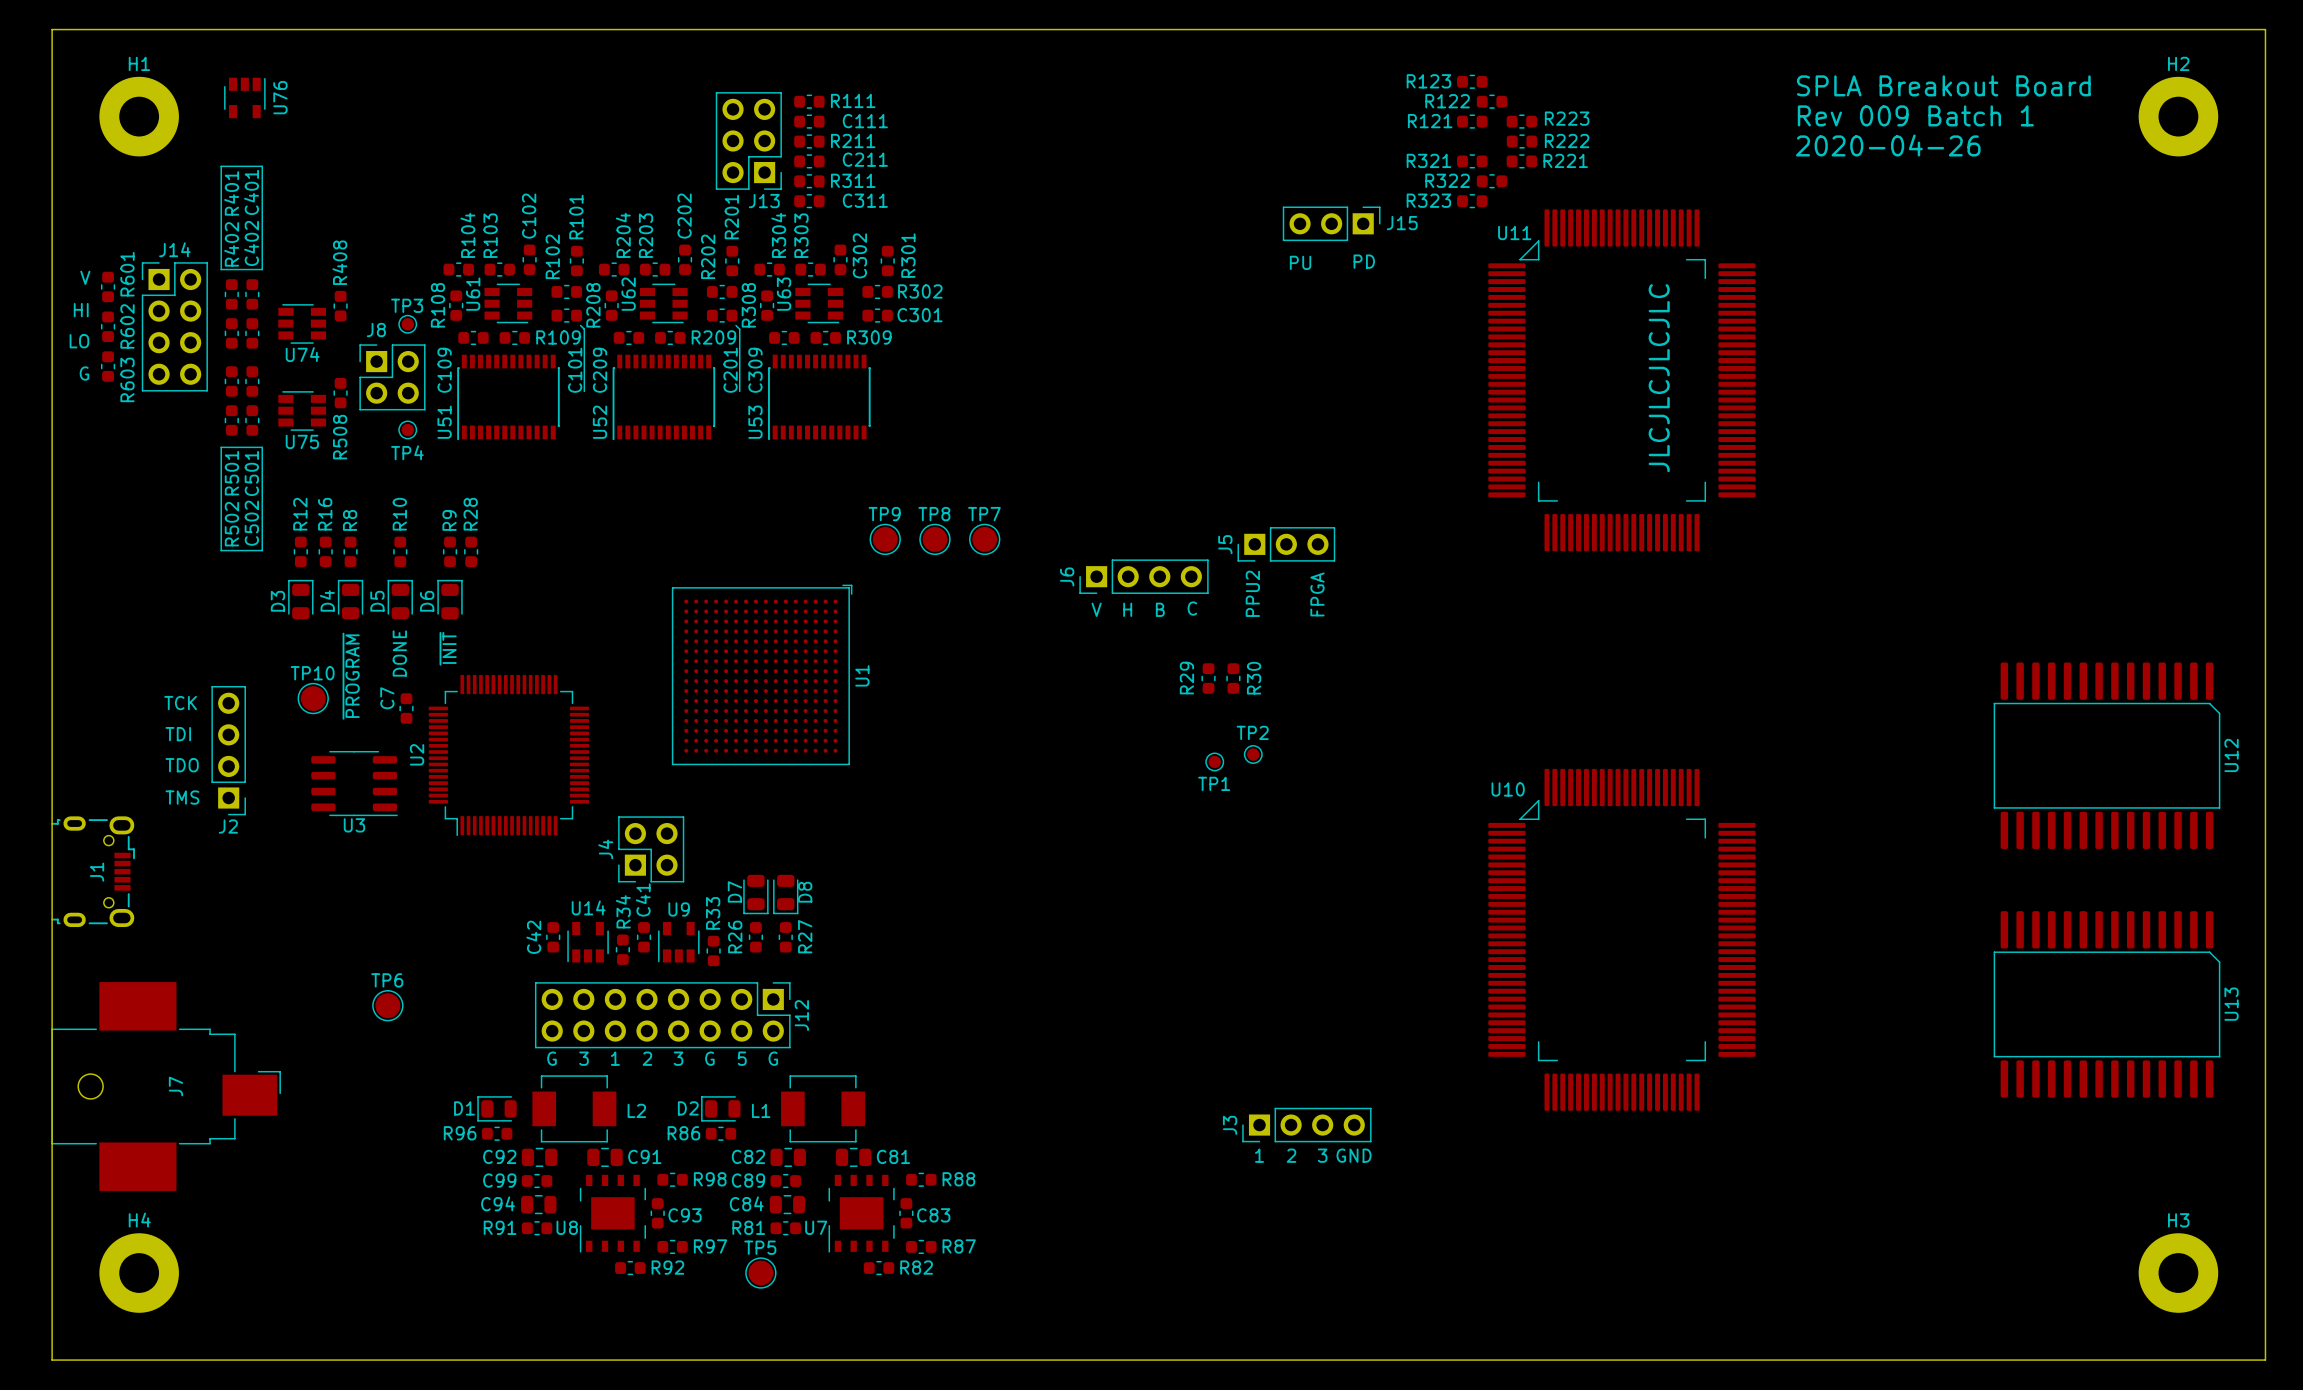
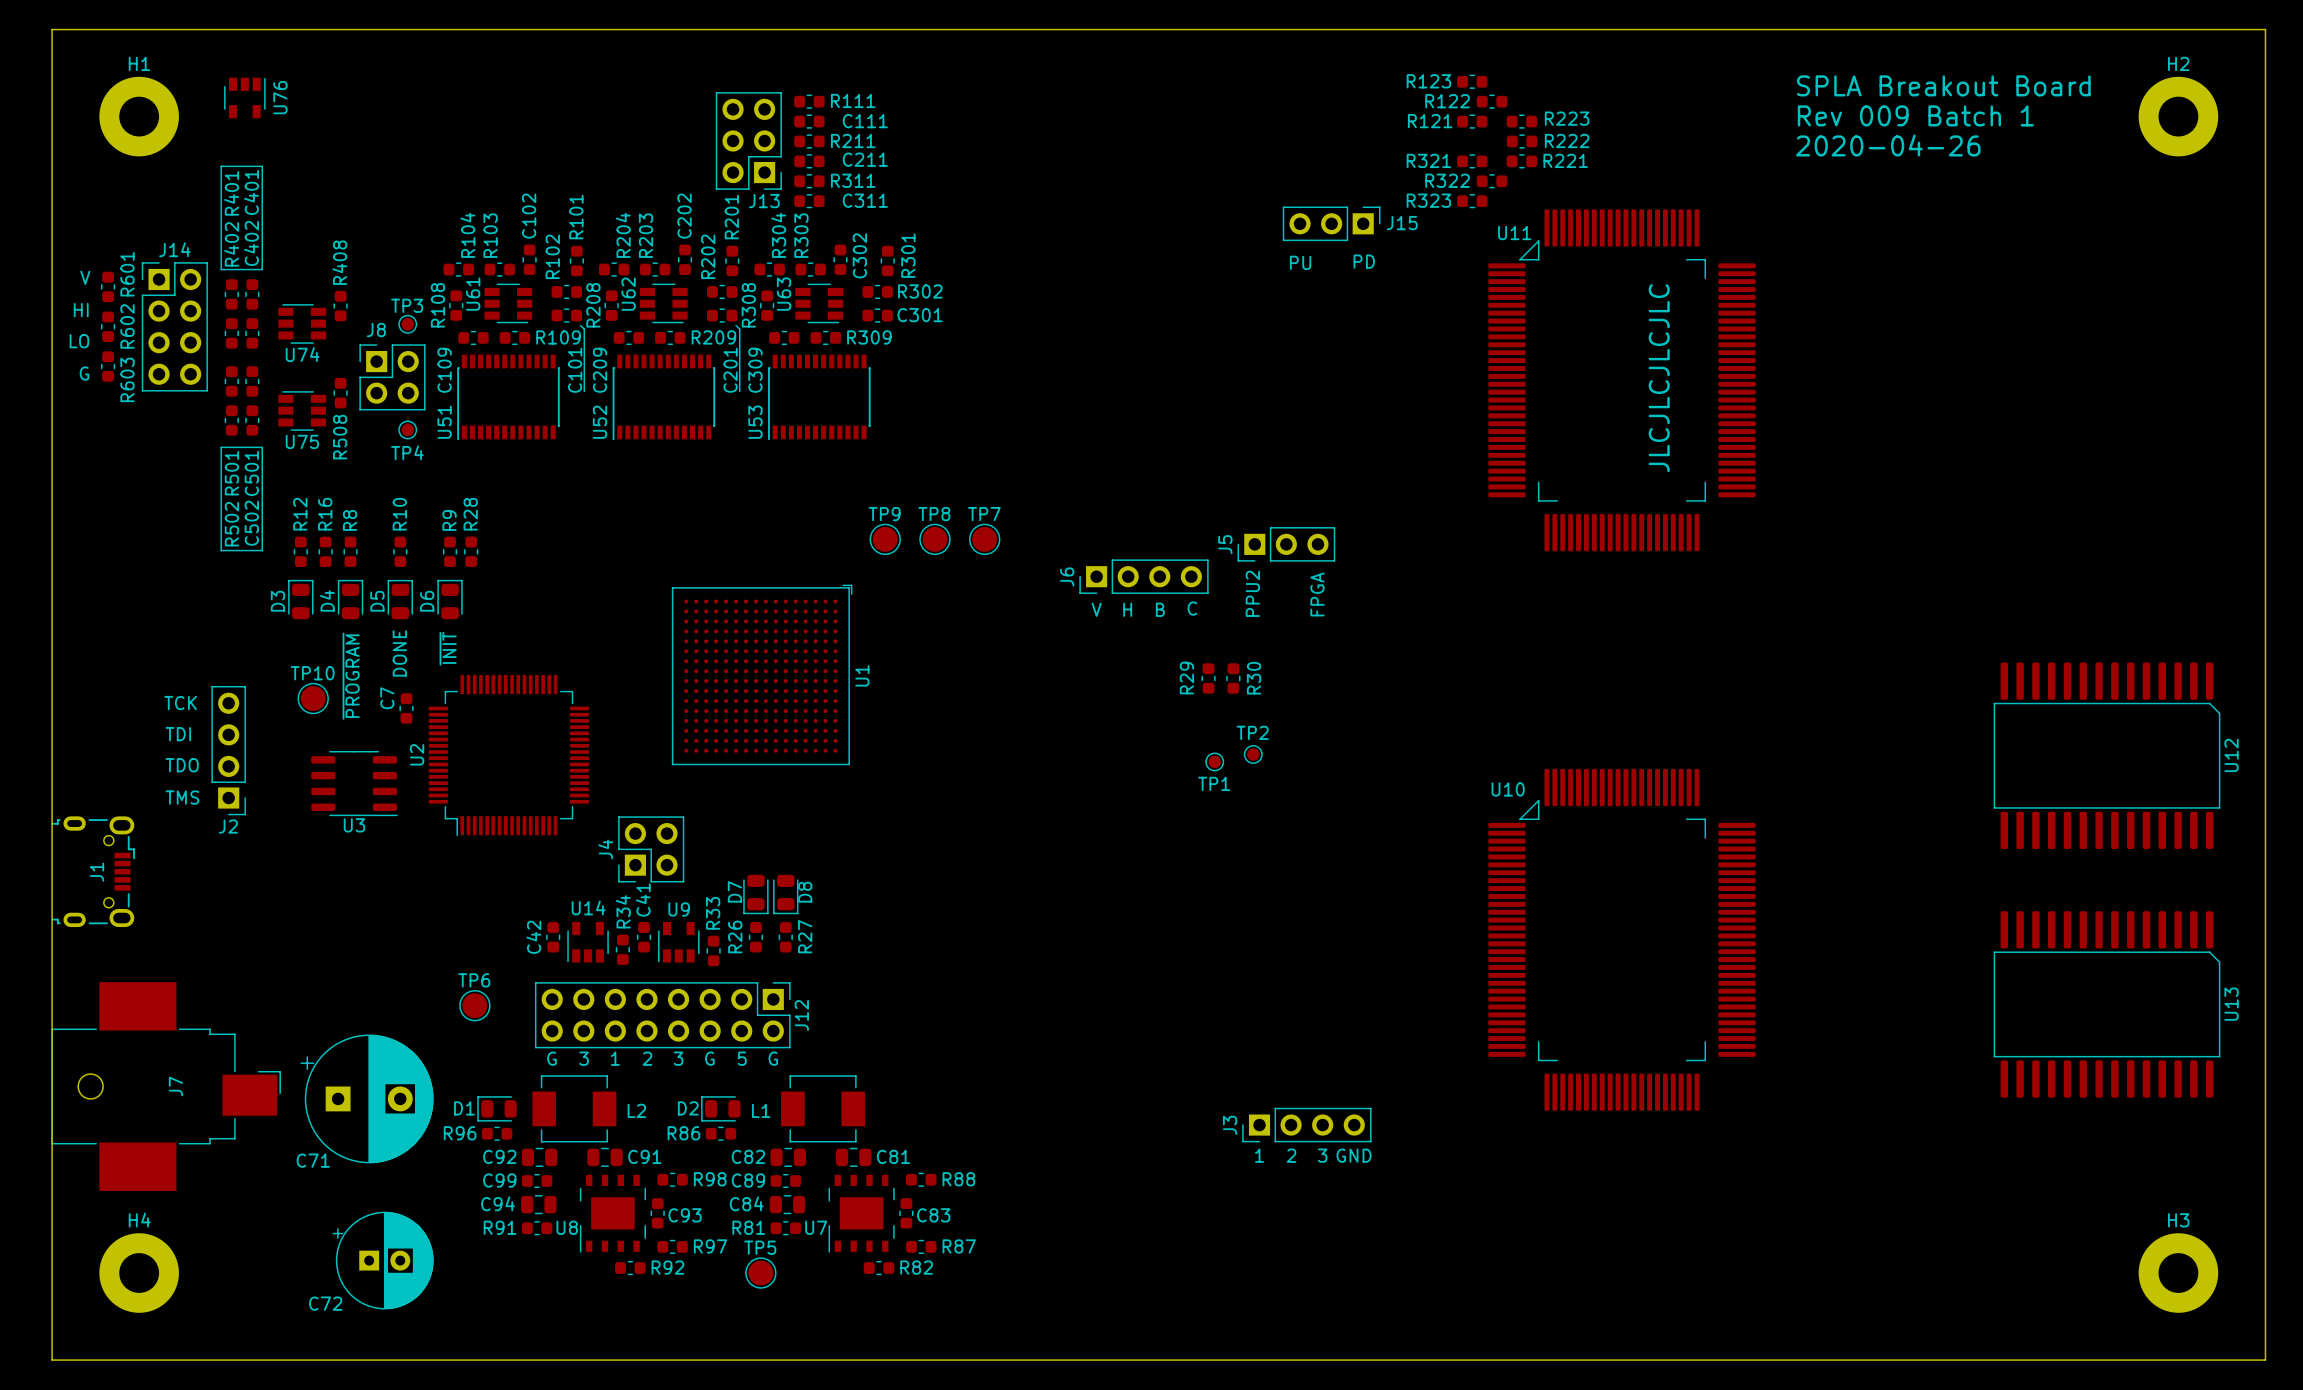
TP6 position: (387, 1005) -> (474, 1005)
C71: none -> (366, 1098)
C72: none -> (383, 1260)

